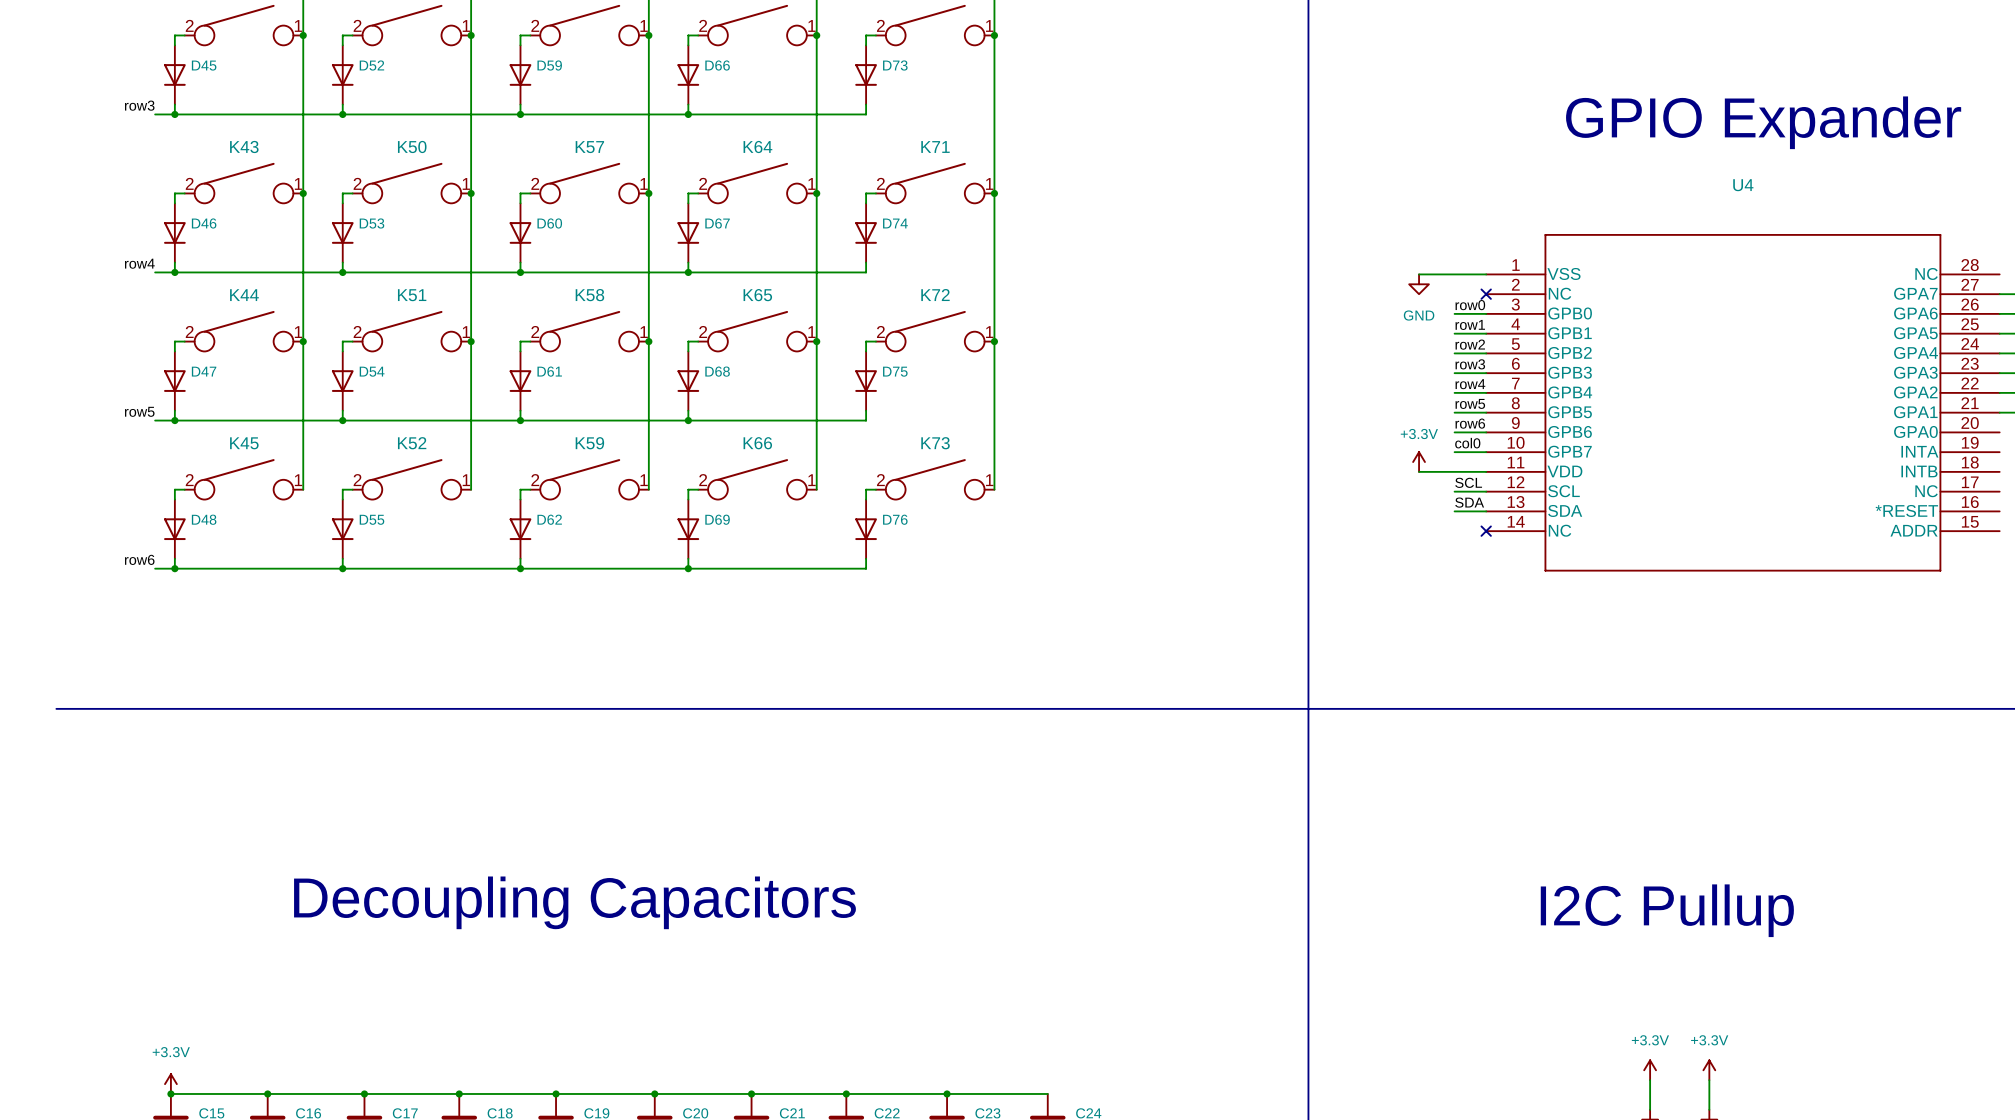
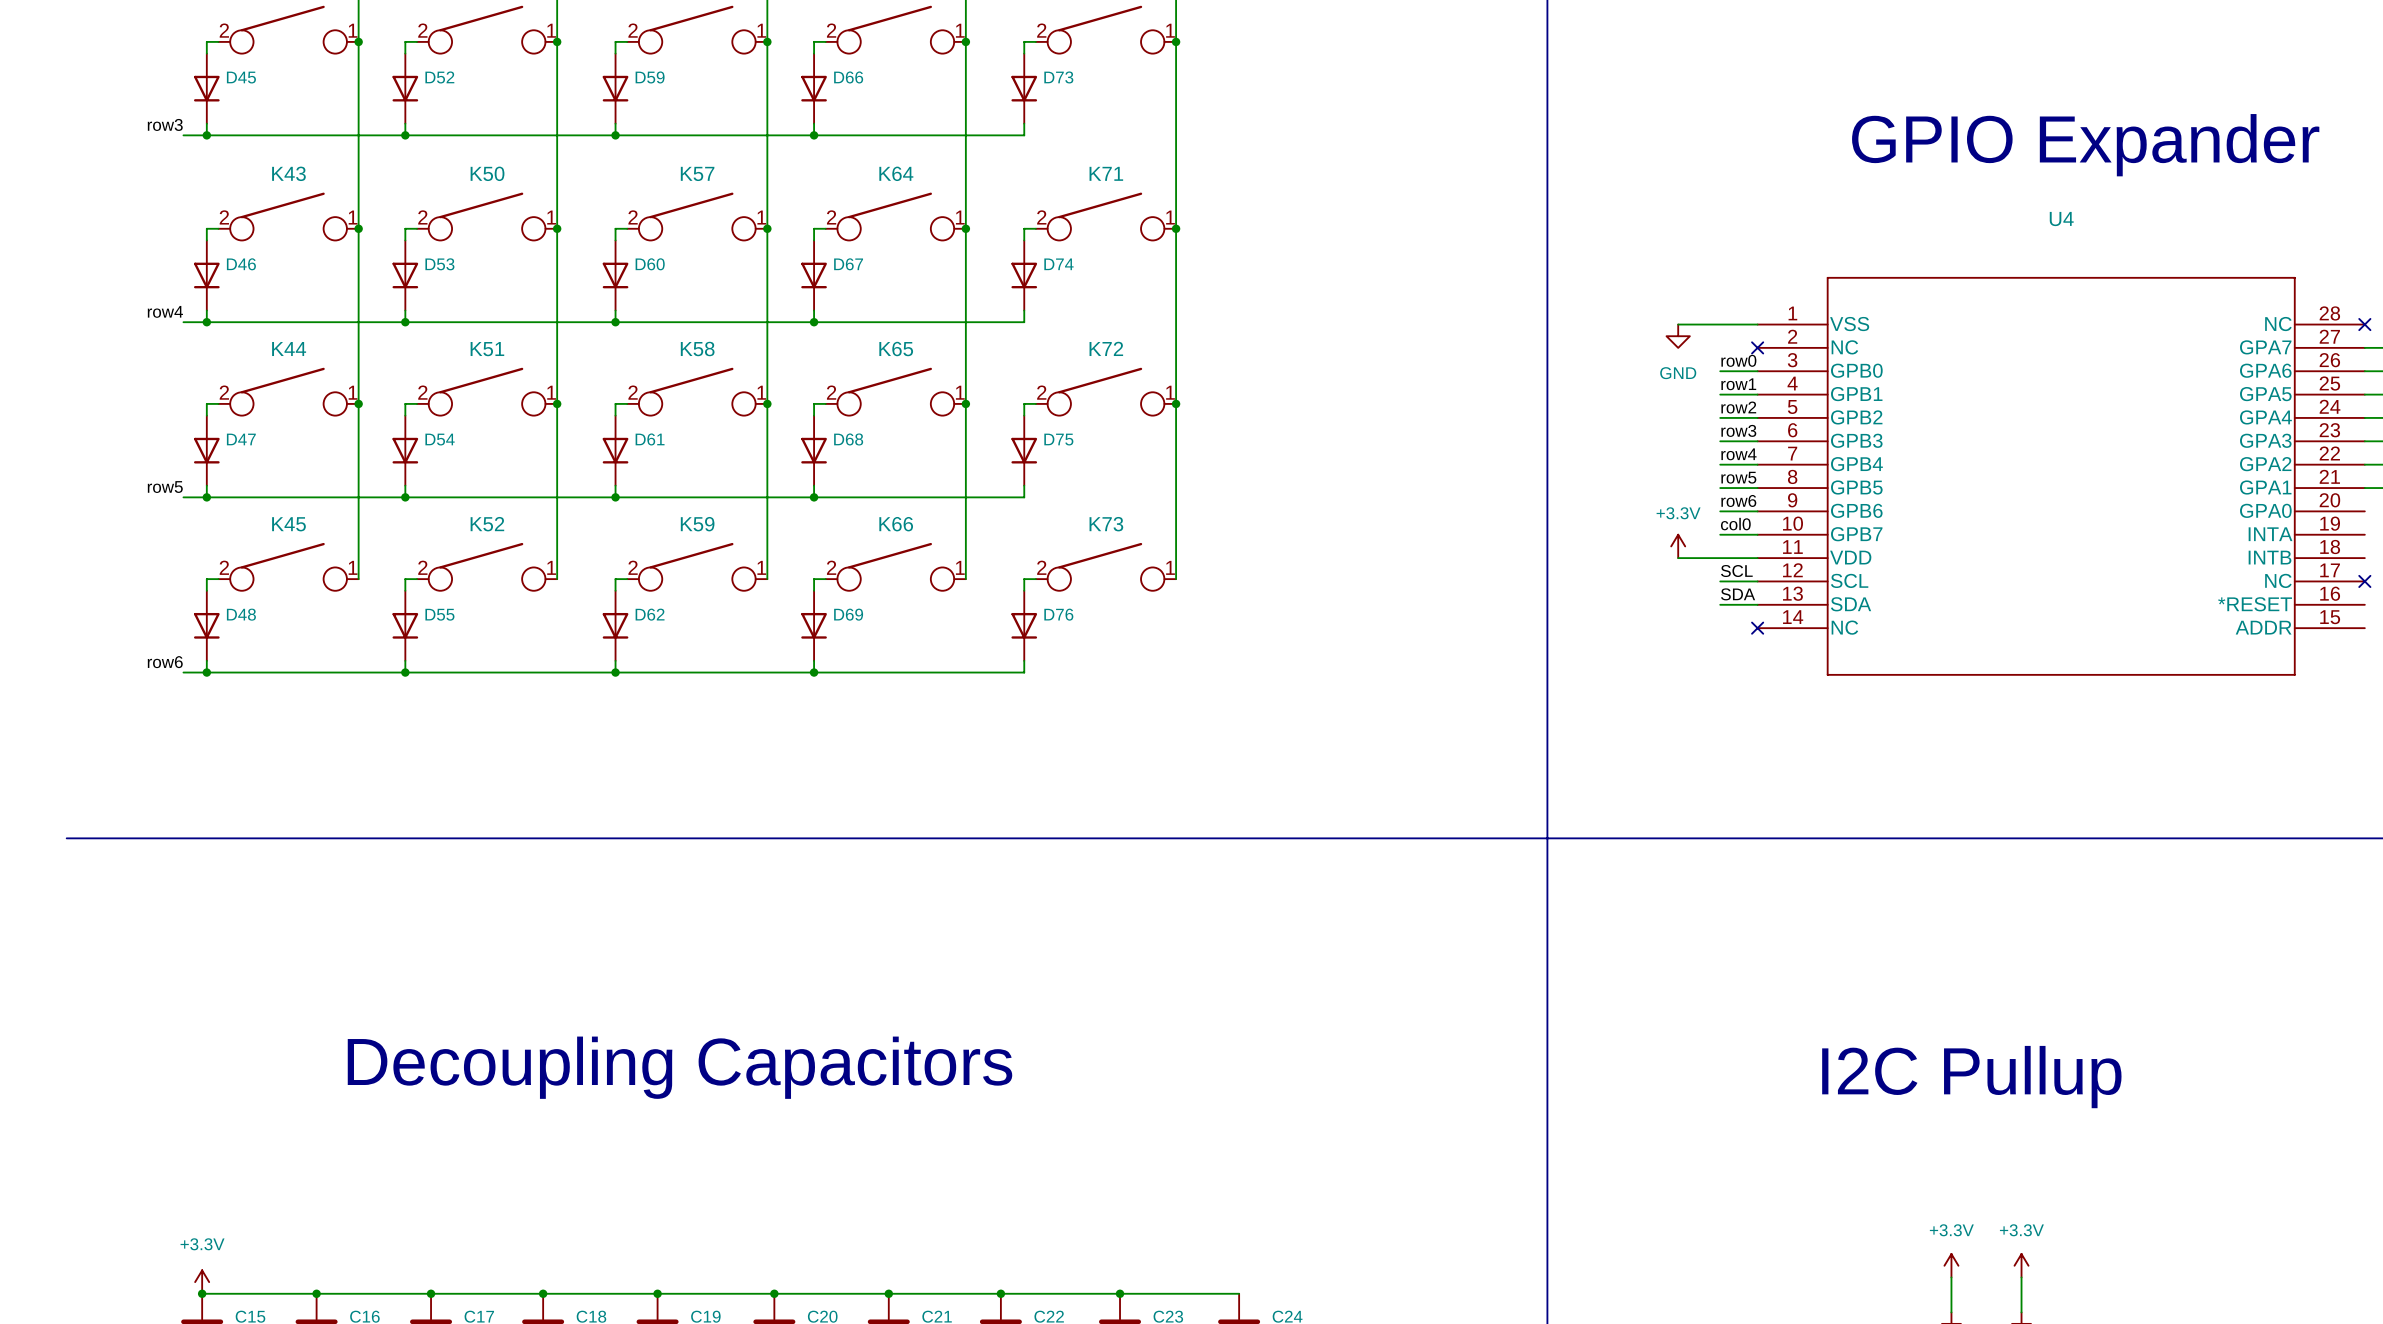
no-connect mark: none -> (2364, 324)
no-connect mark: none -> (2364, 581)

